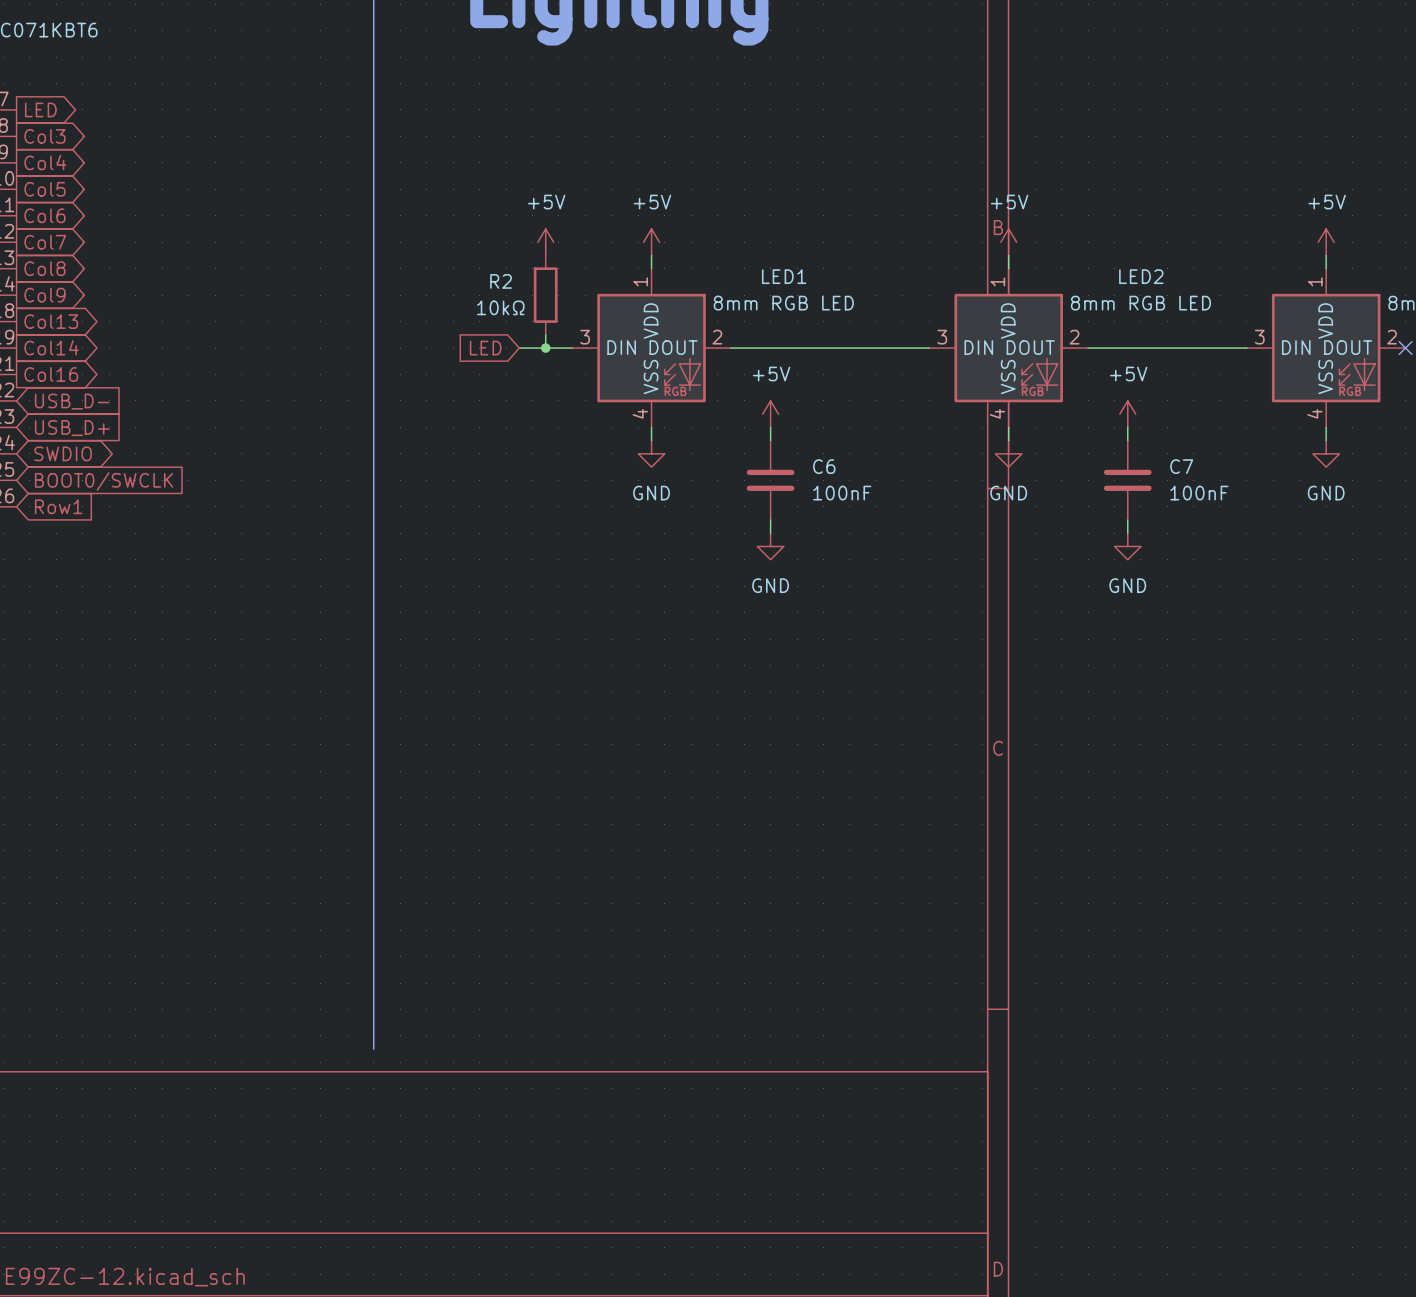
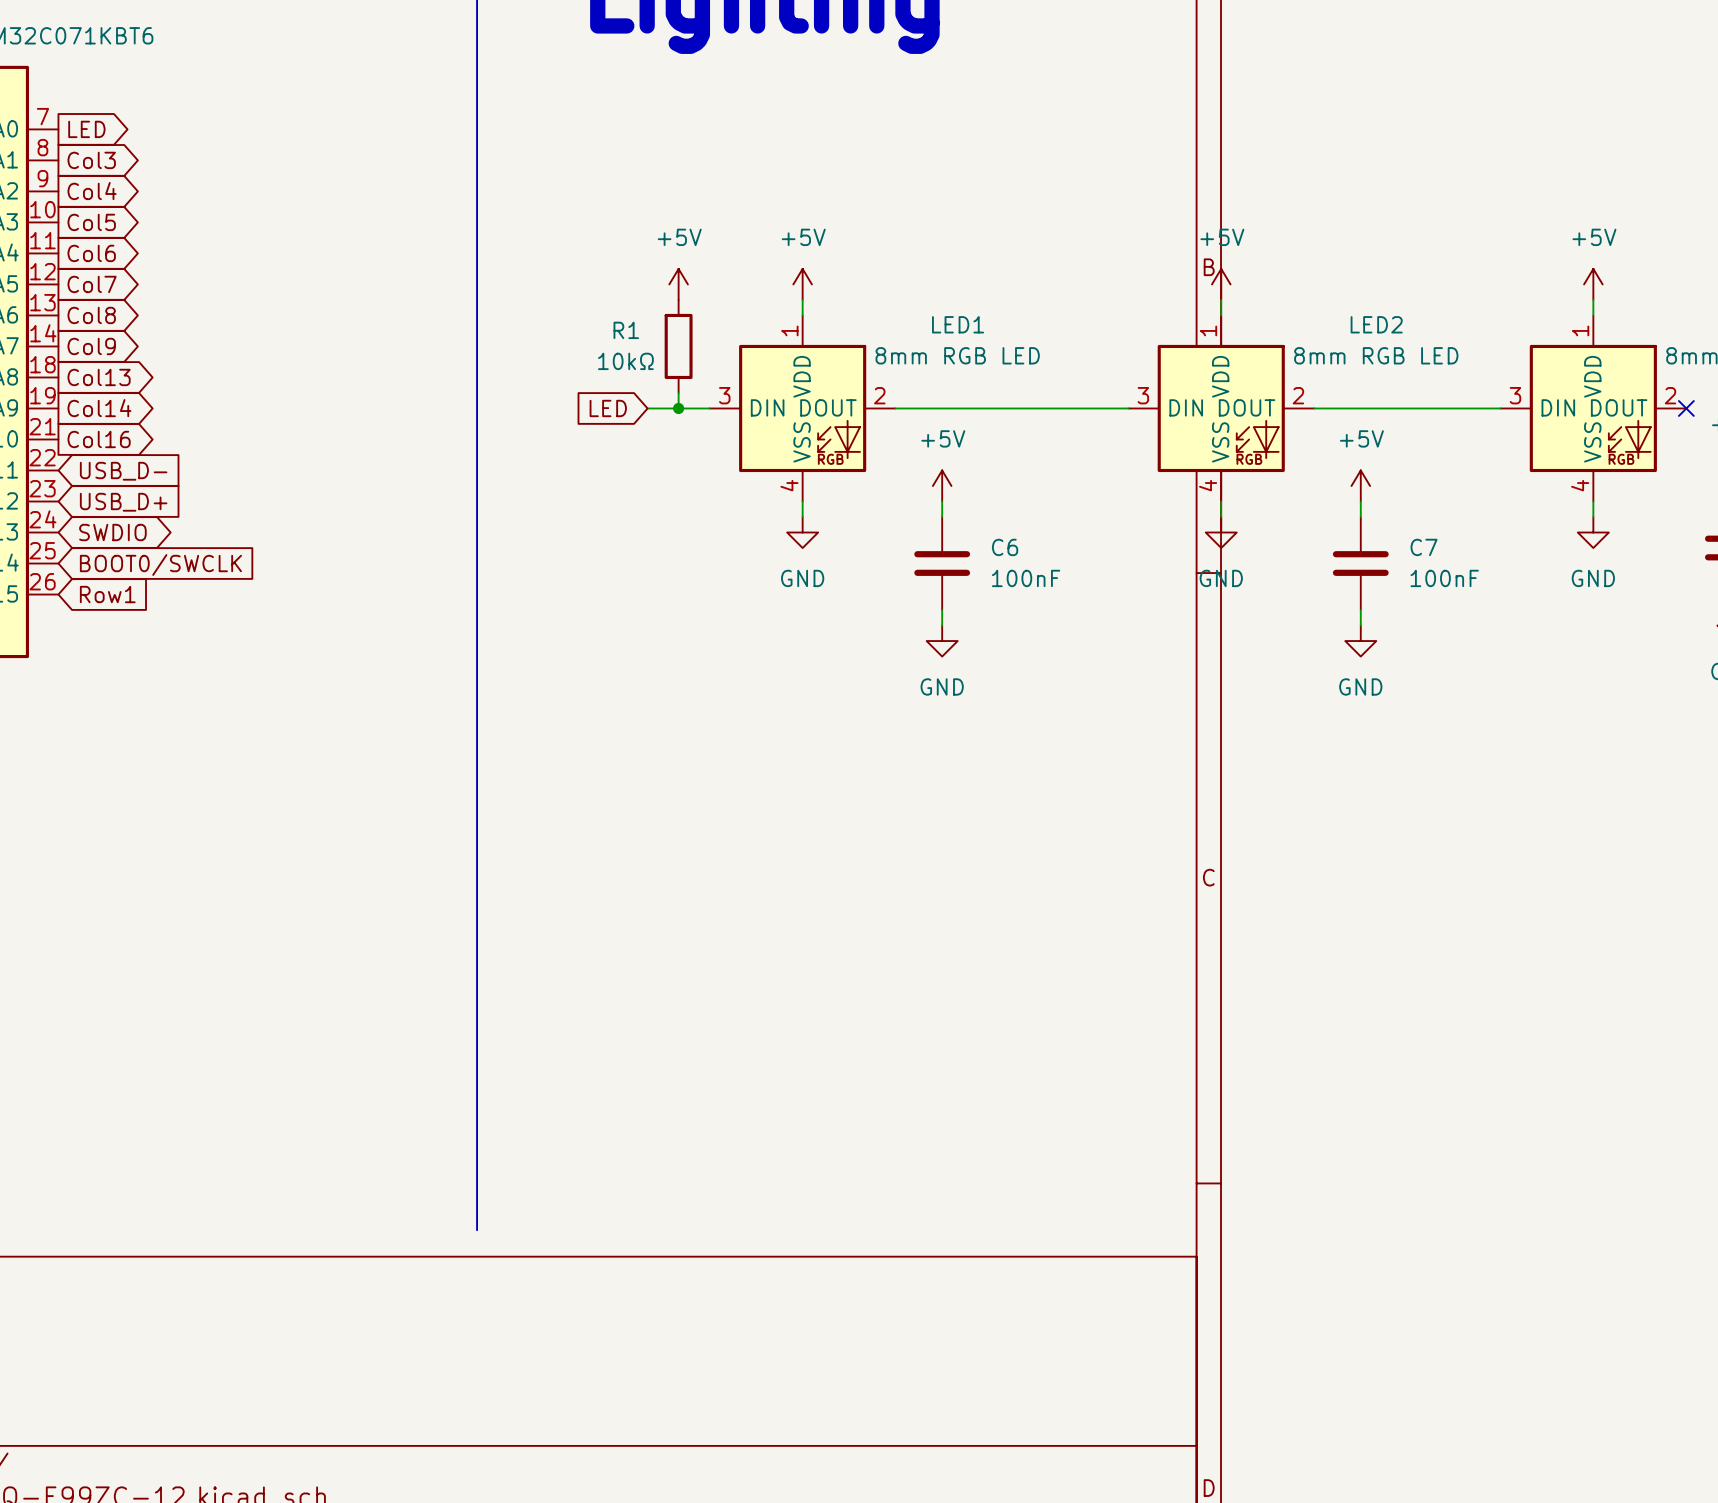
R2 name: R2 (501, 281) -> R1 (626, 330)

